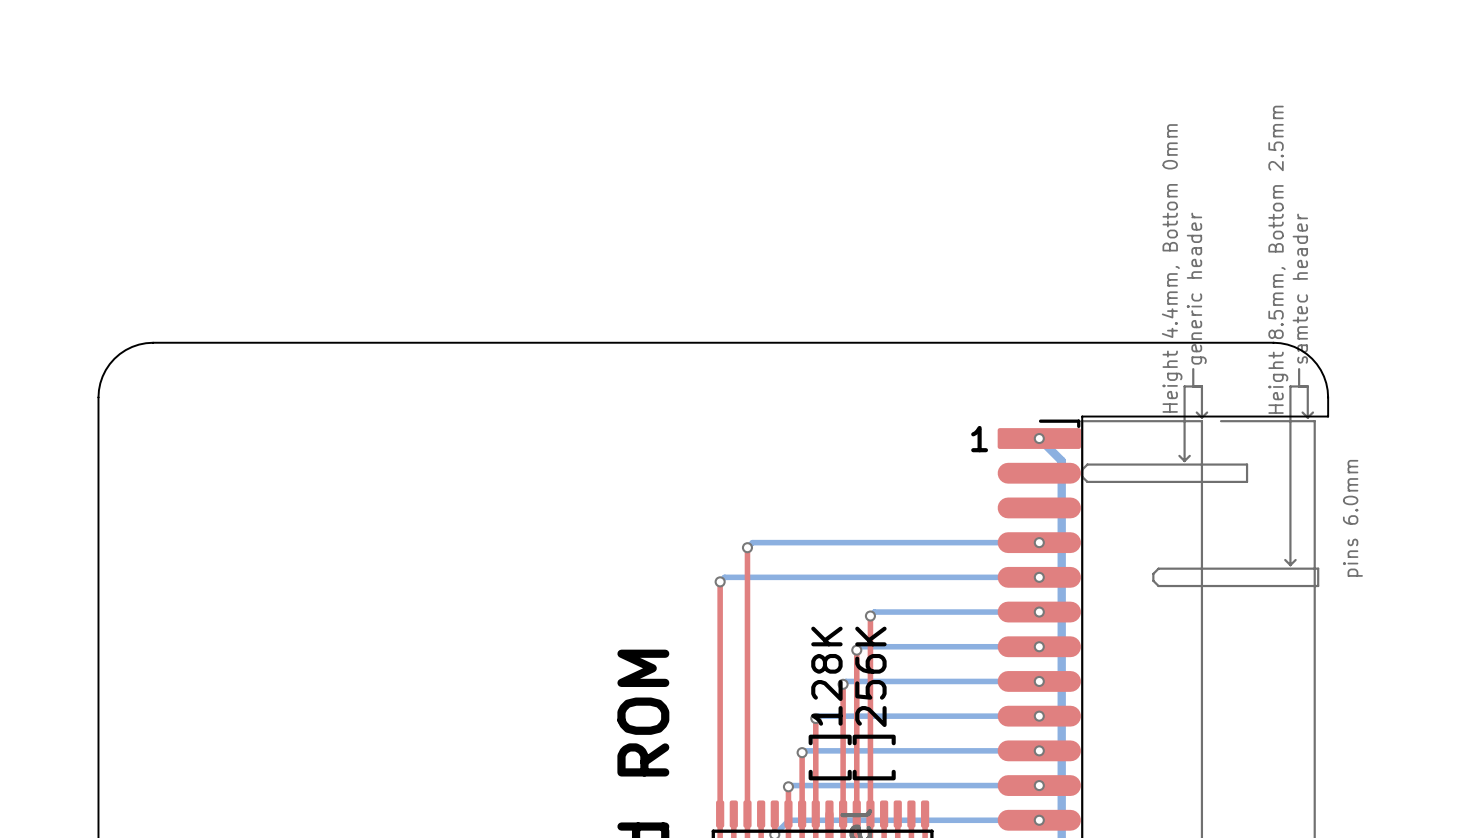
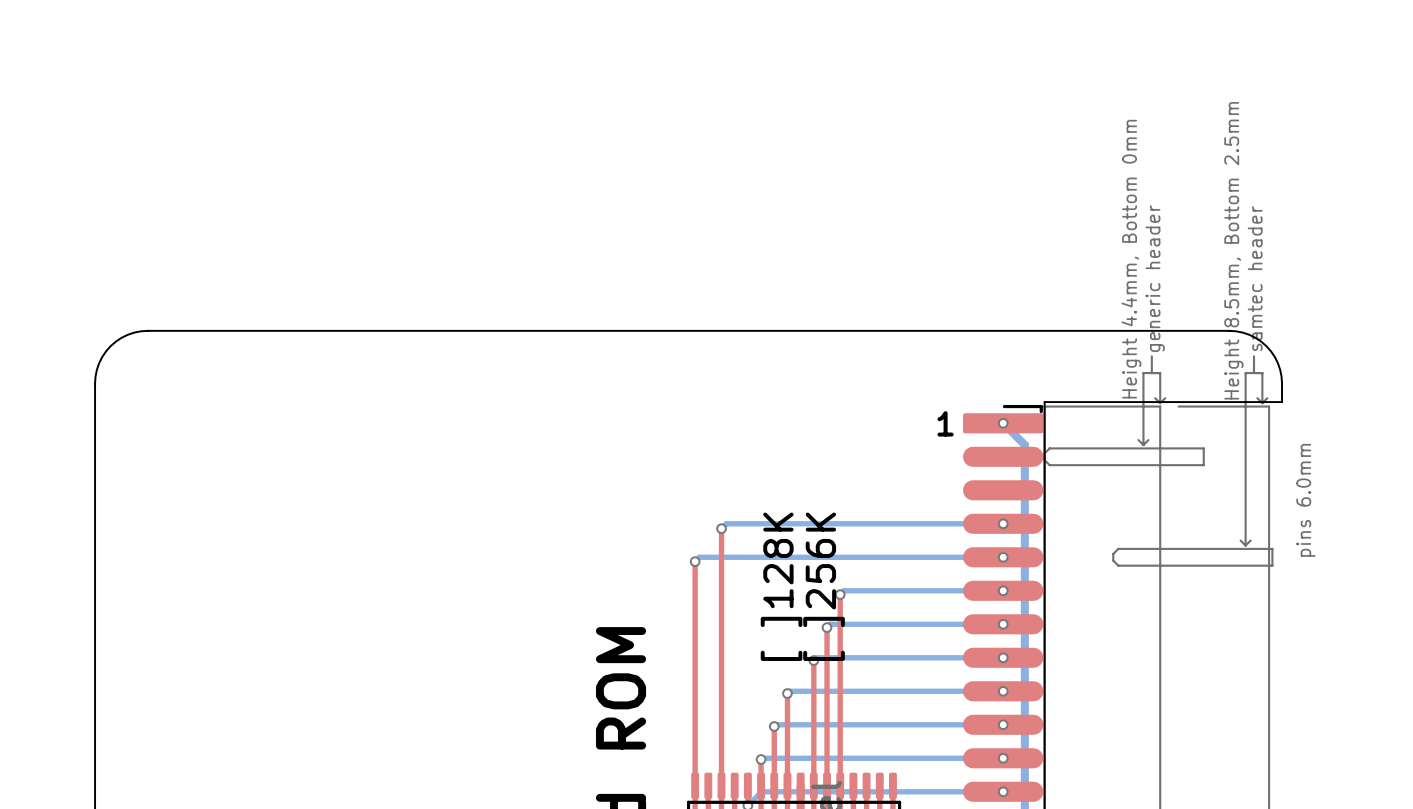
text position: [ ]128K (830, 703) -> [ ]128K (781, 586)
text position: [ ]256K (874, 703) -> [ ]256K (824, 586)

